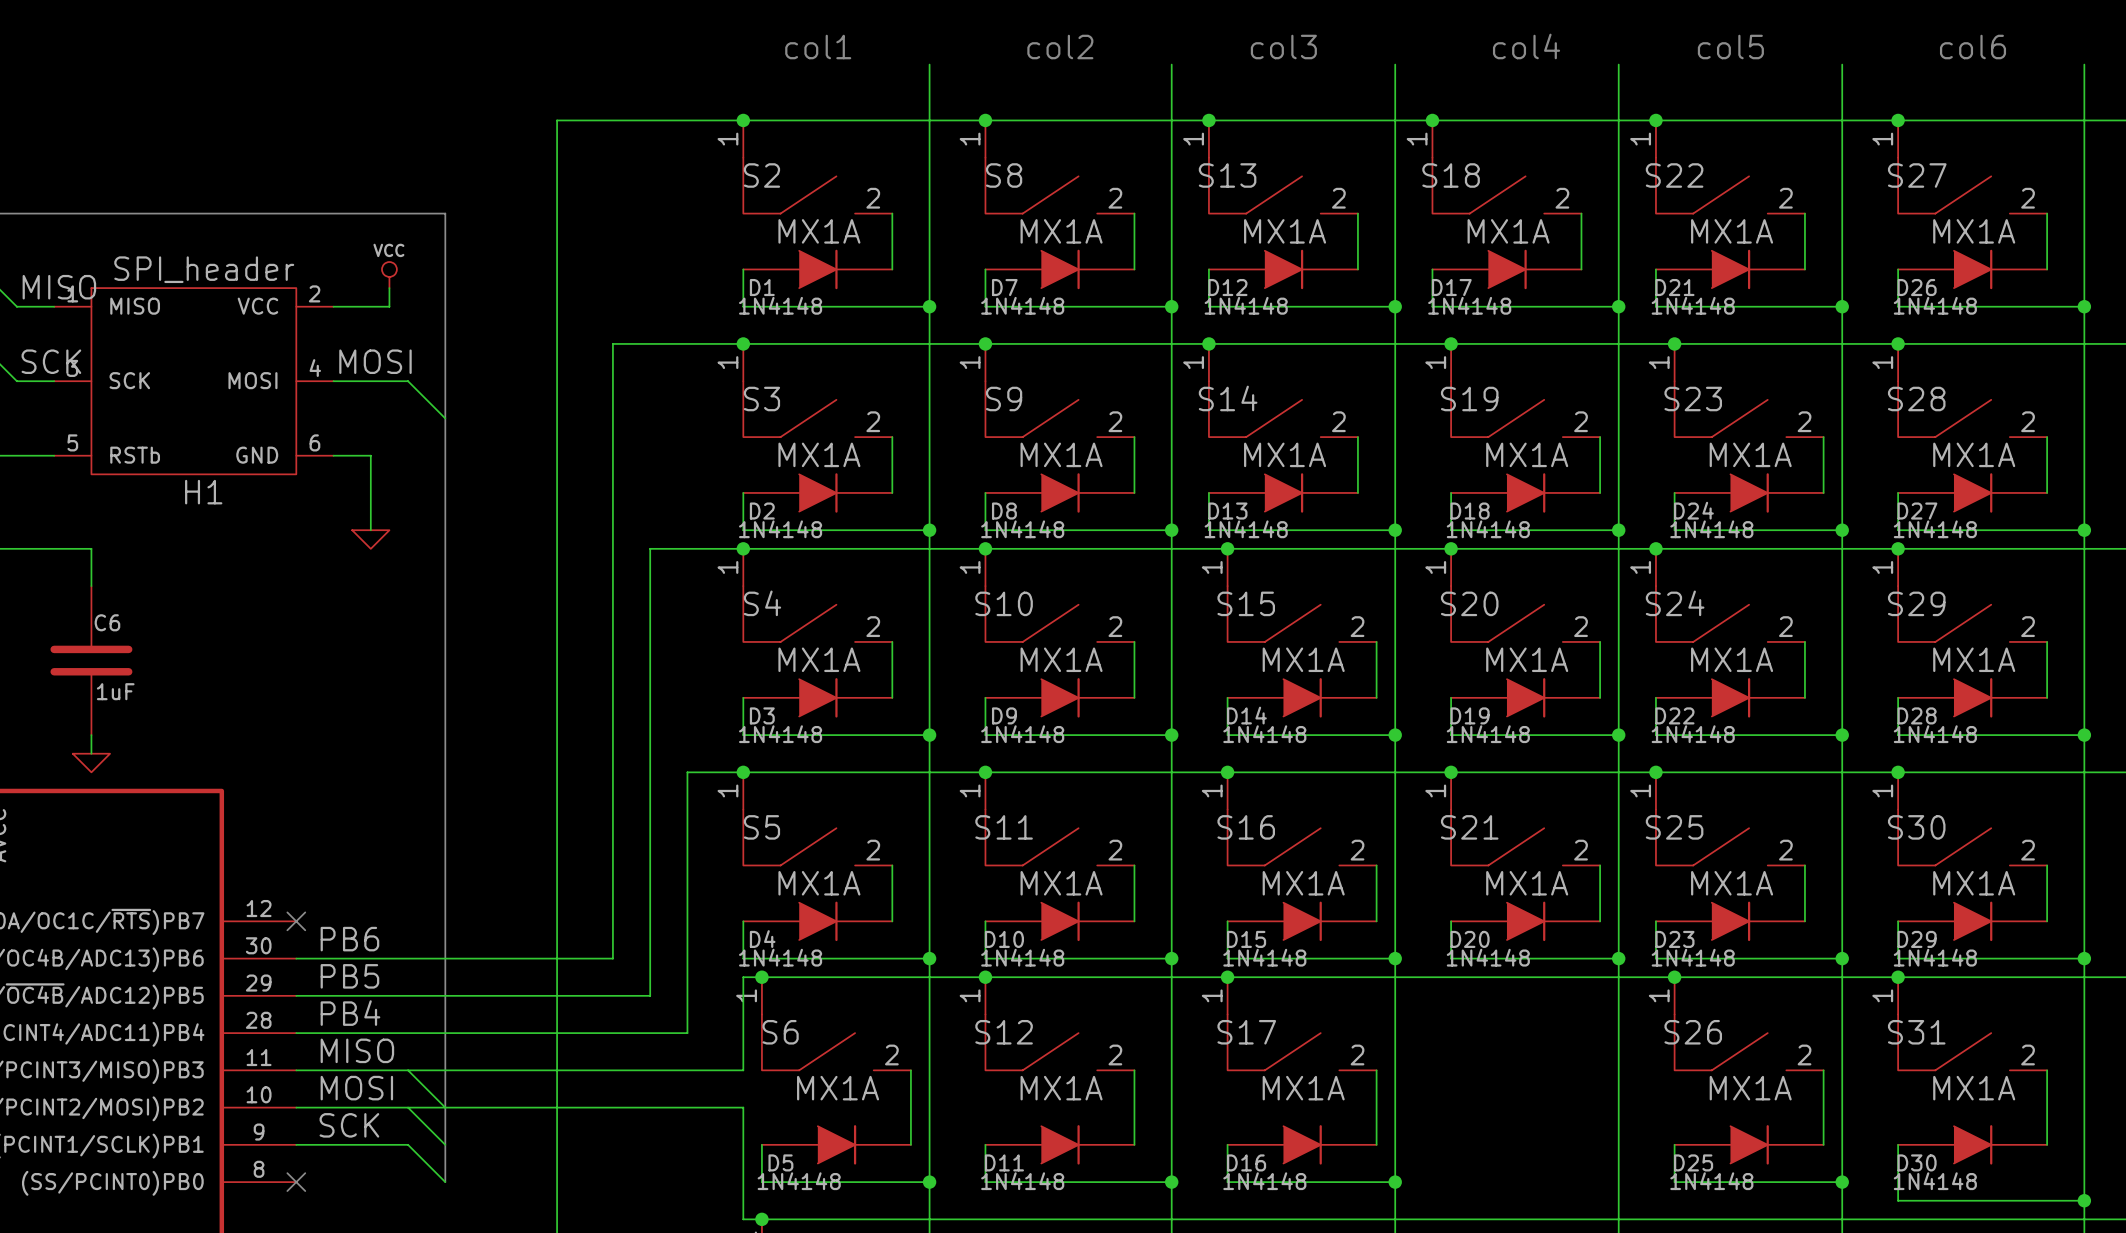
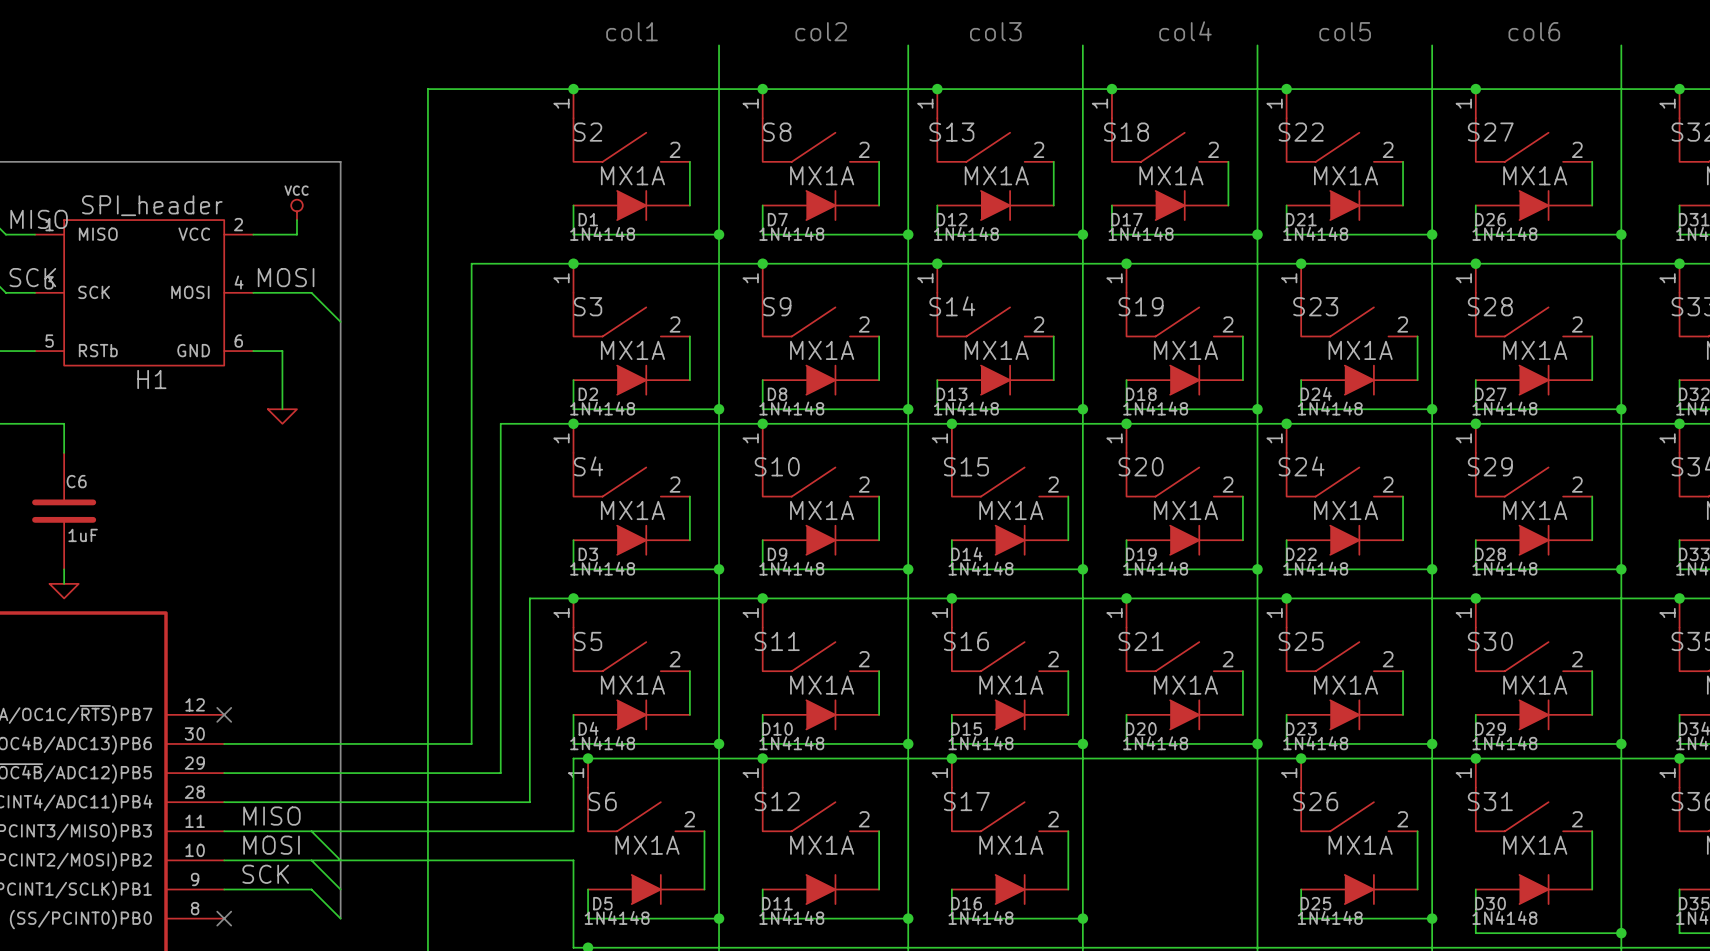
label: PB6 (349, 939) -> none
label: PB5 (349, 976) -> none
label: PB4 (350, 1013) -> none

